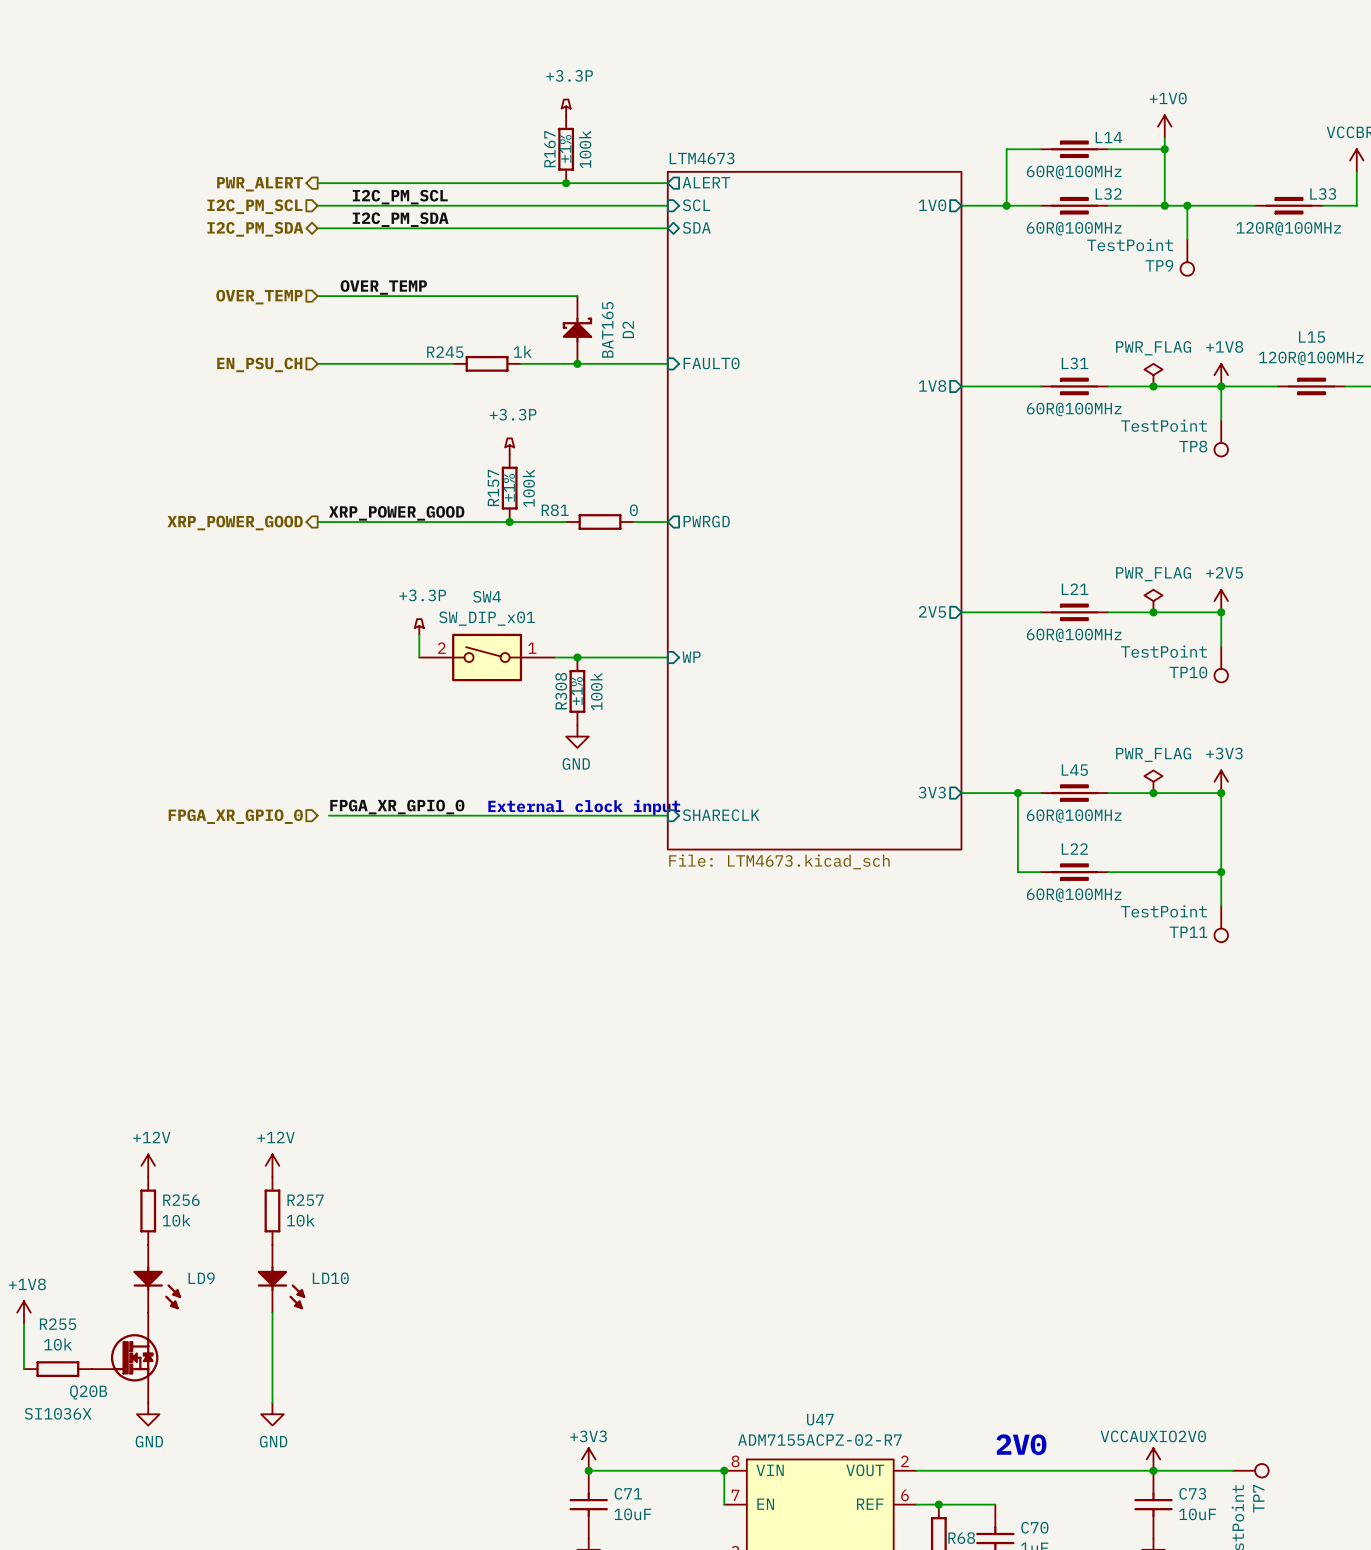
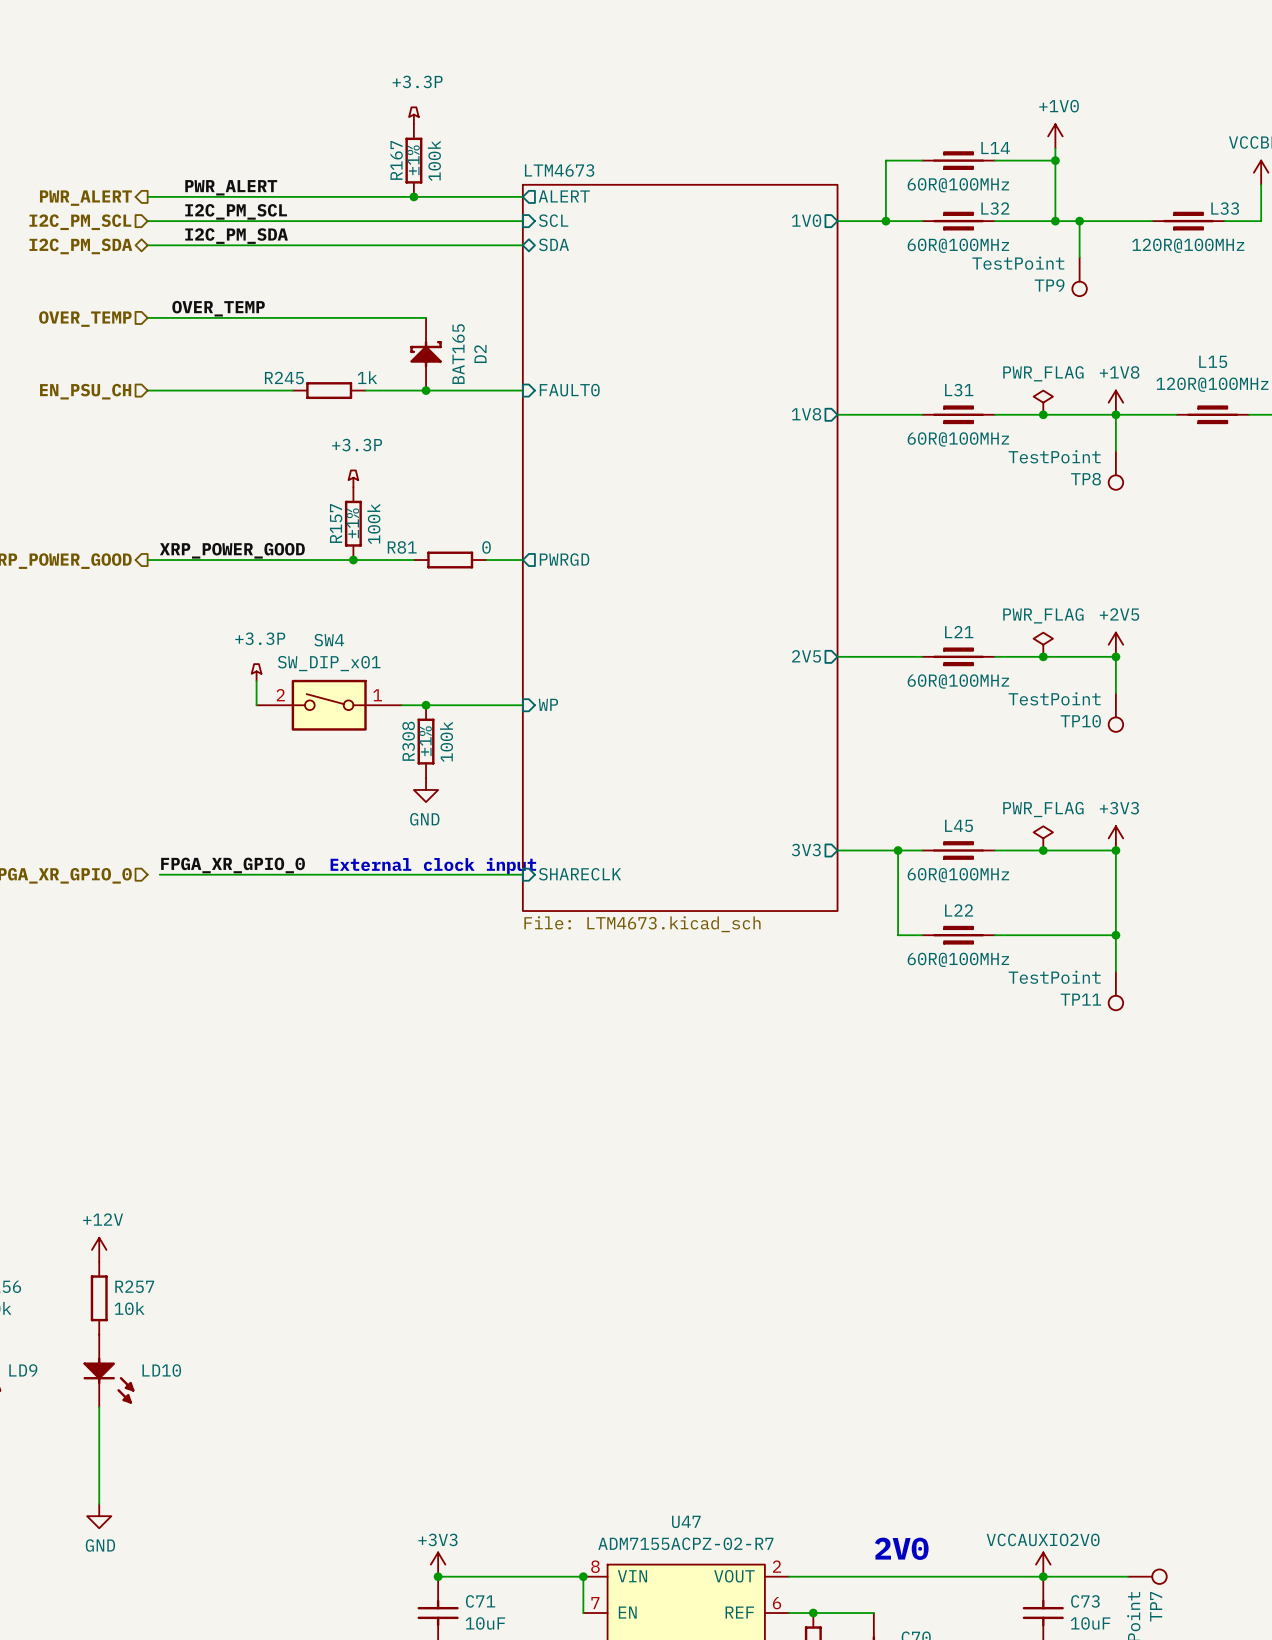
label: none -> PWR_ALERT (231, 187)

